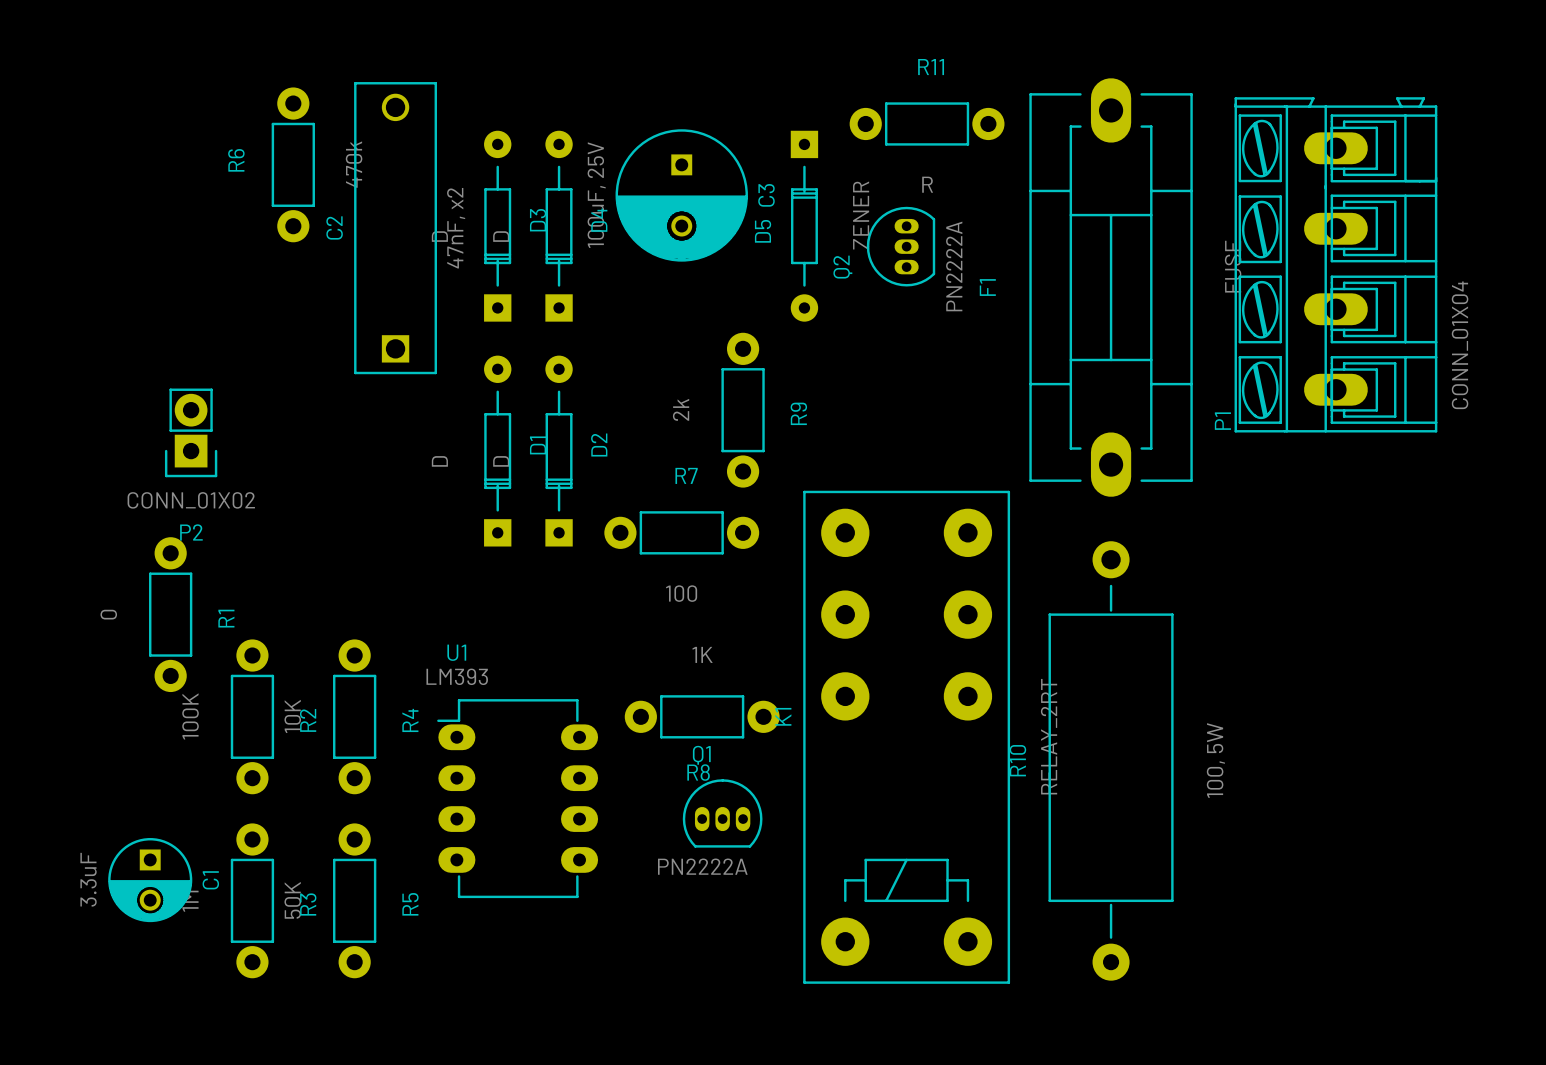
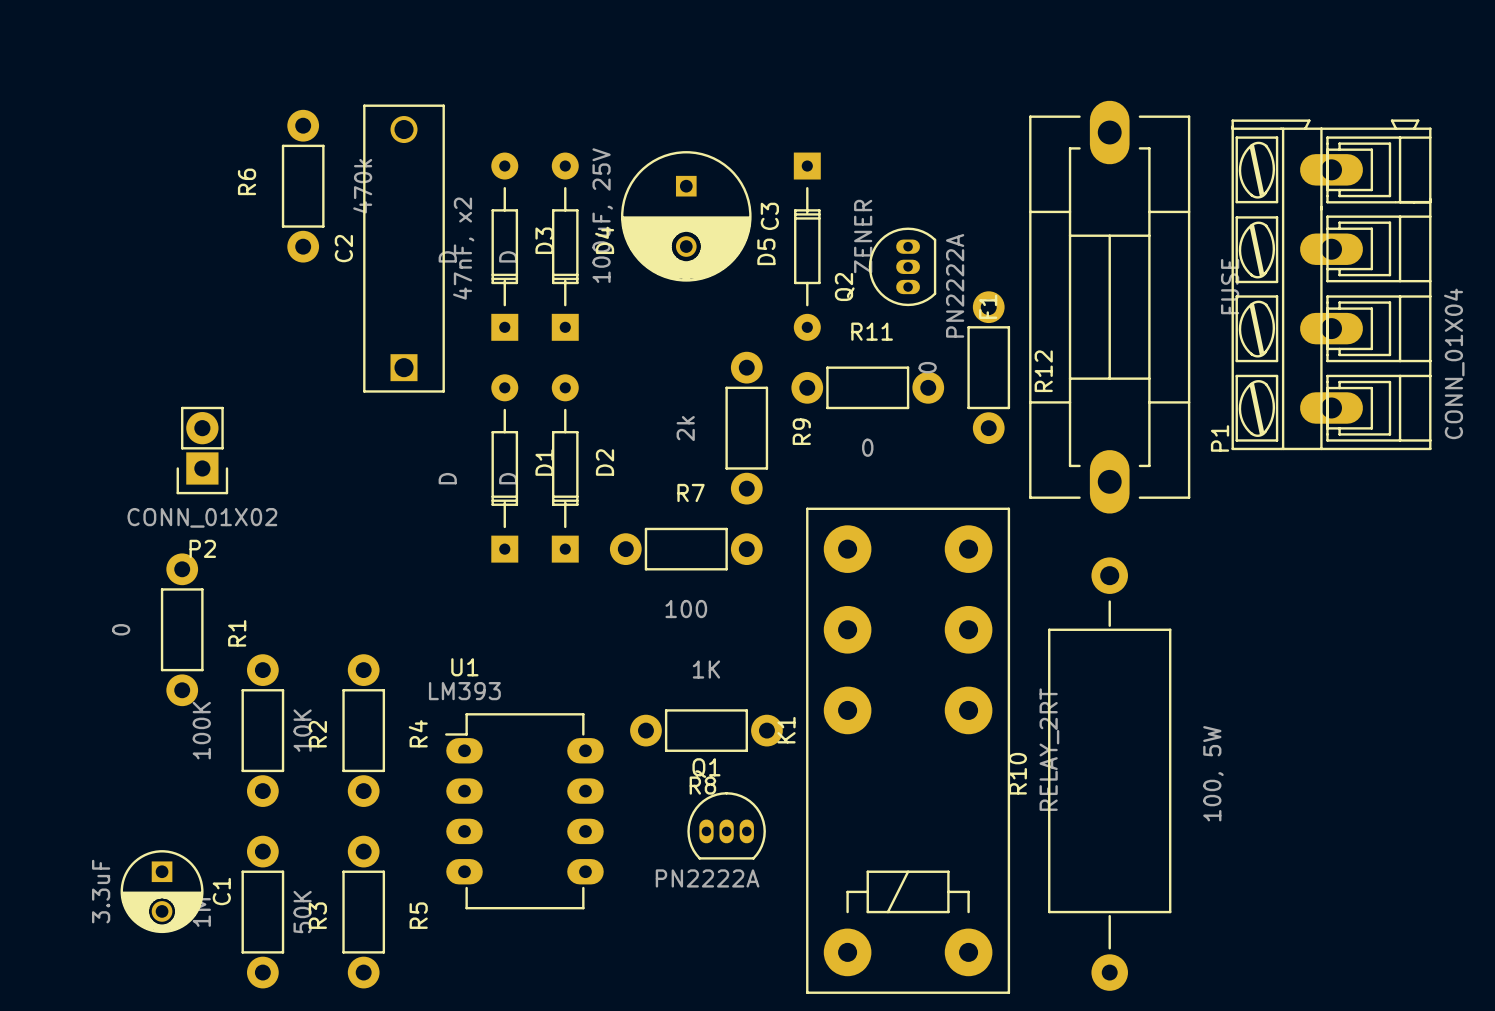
R11 position: (927, 123) -> (867, 387)
R11 value: R (927, 184) -> 0 (867, 447)
R12: none -> 0 (988, 367)

